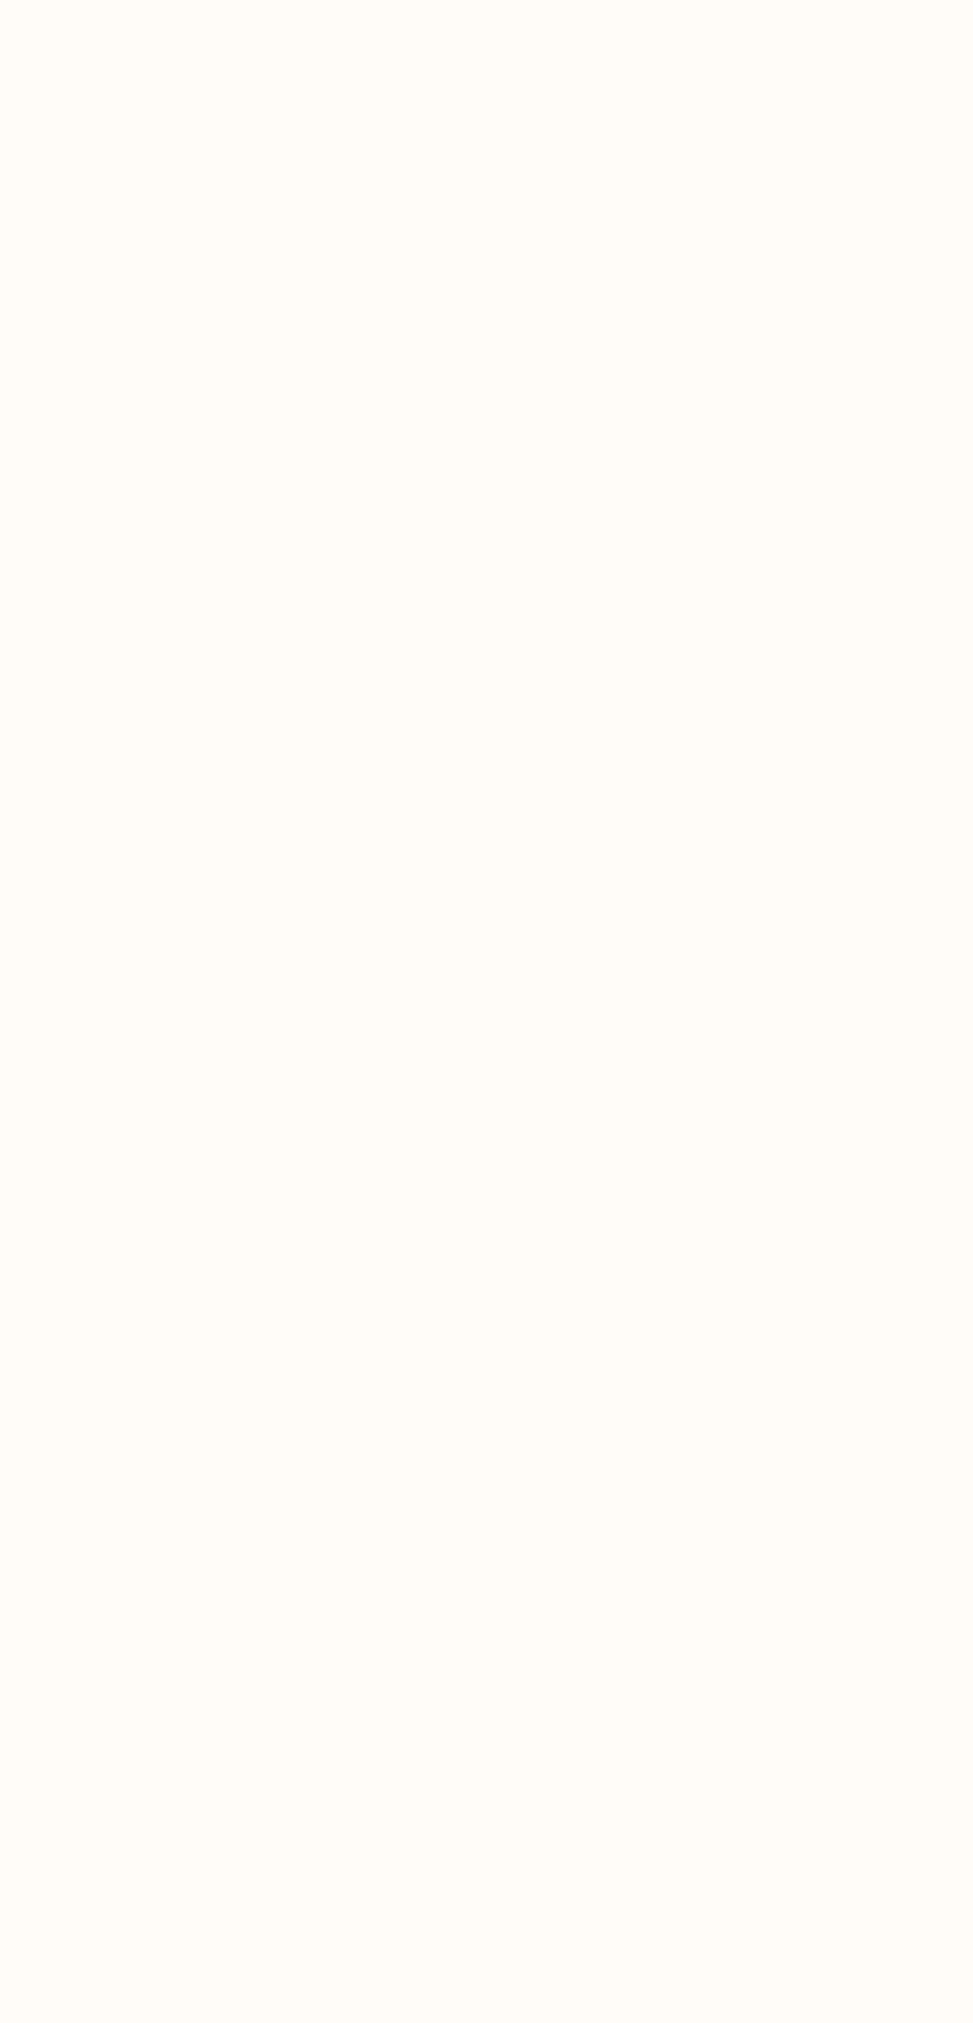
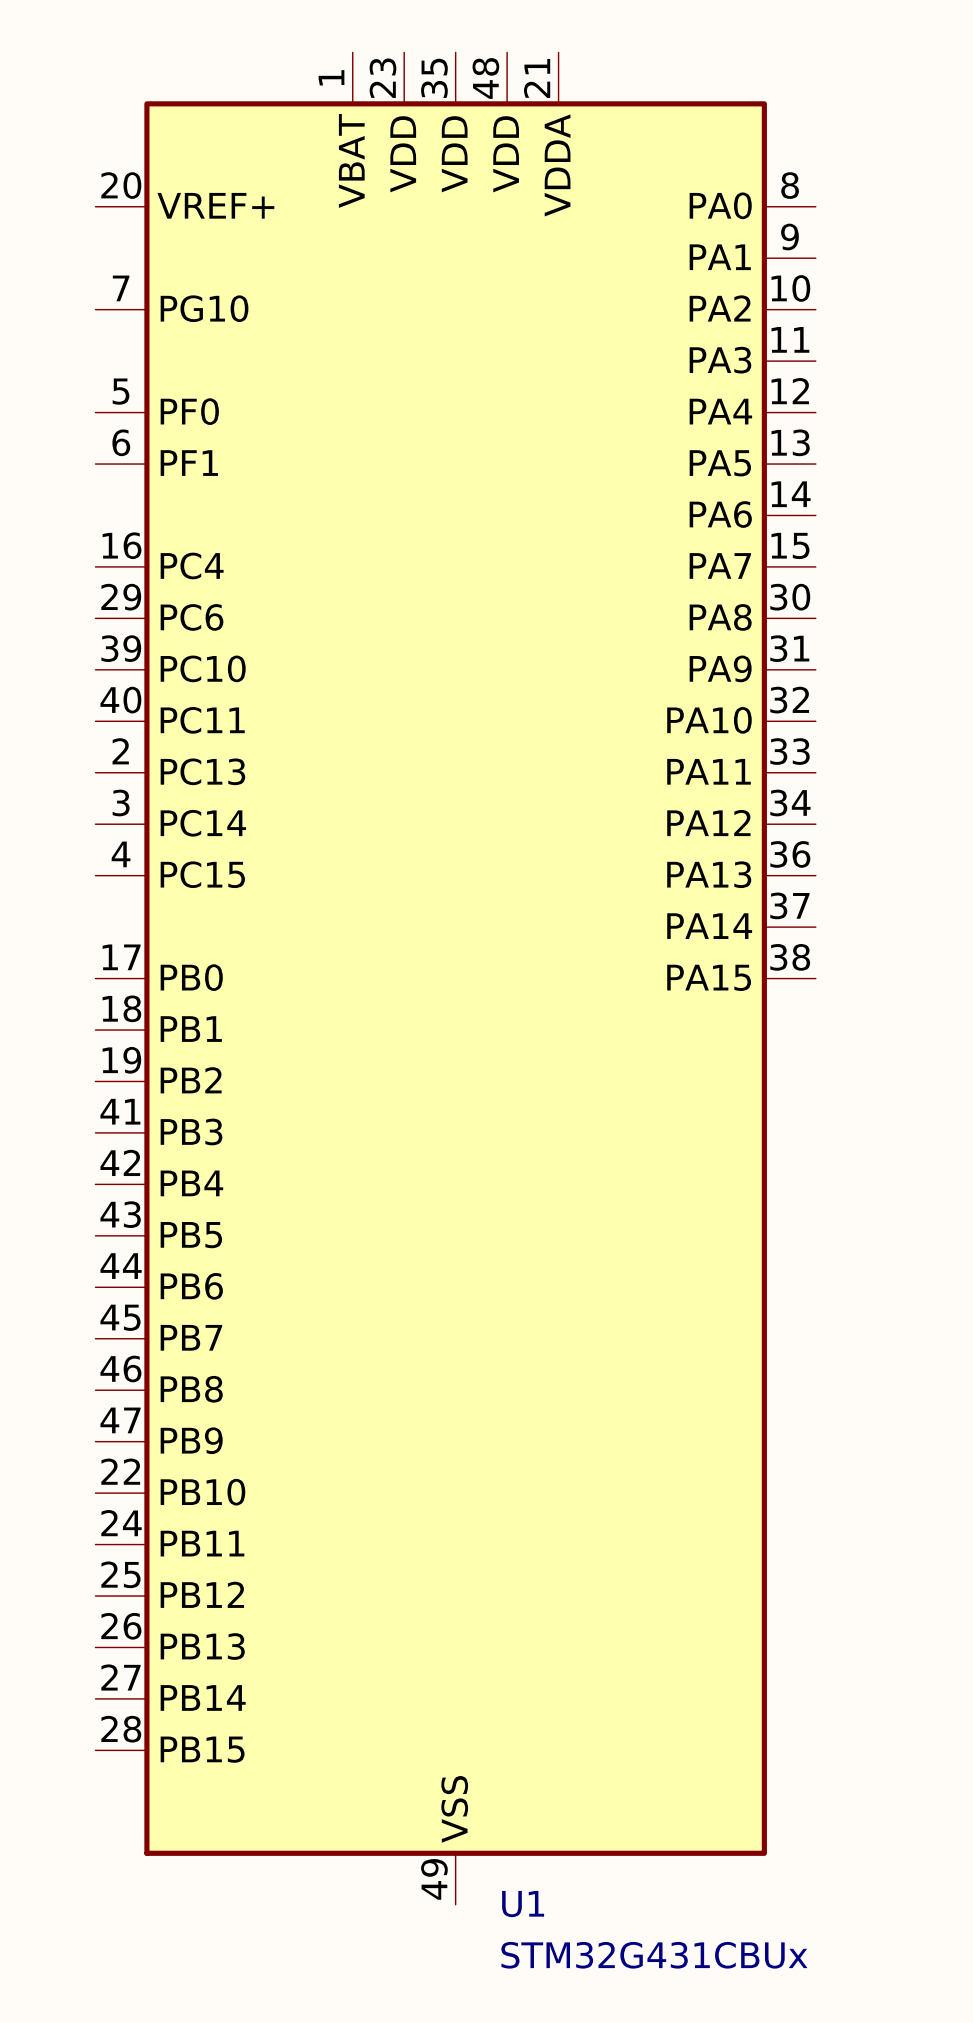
U1: none -> STM32G431CBUx (455, 978)

